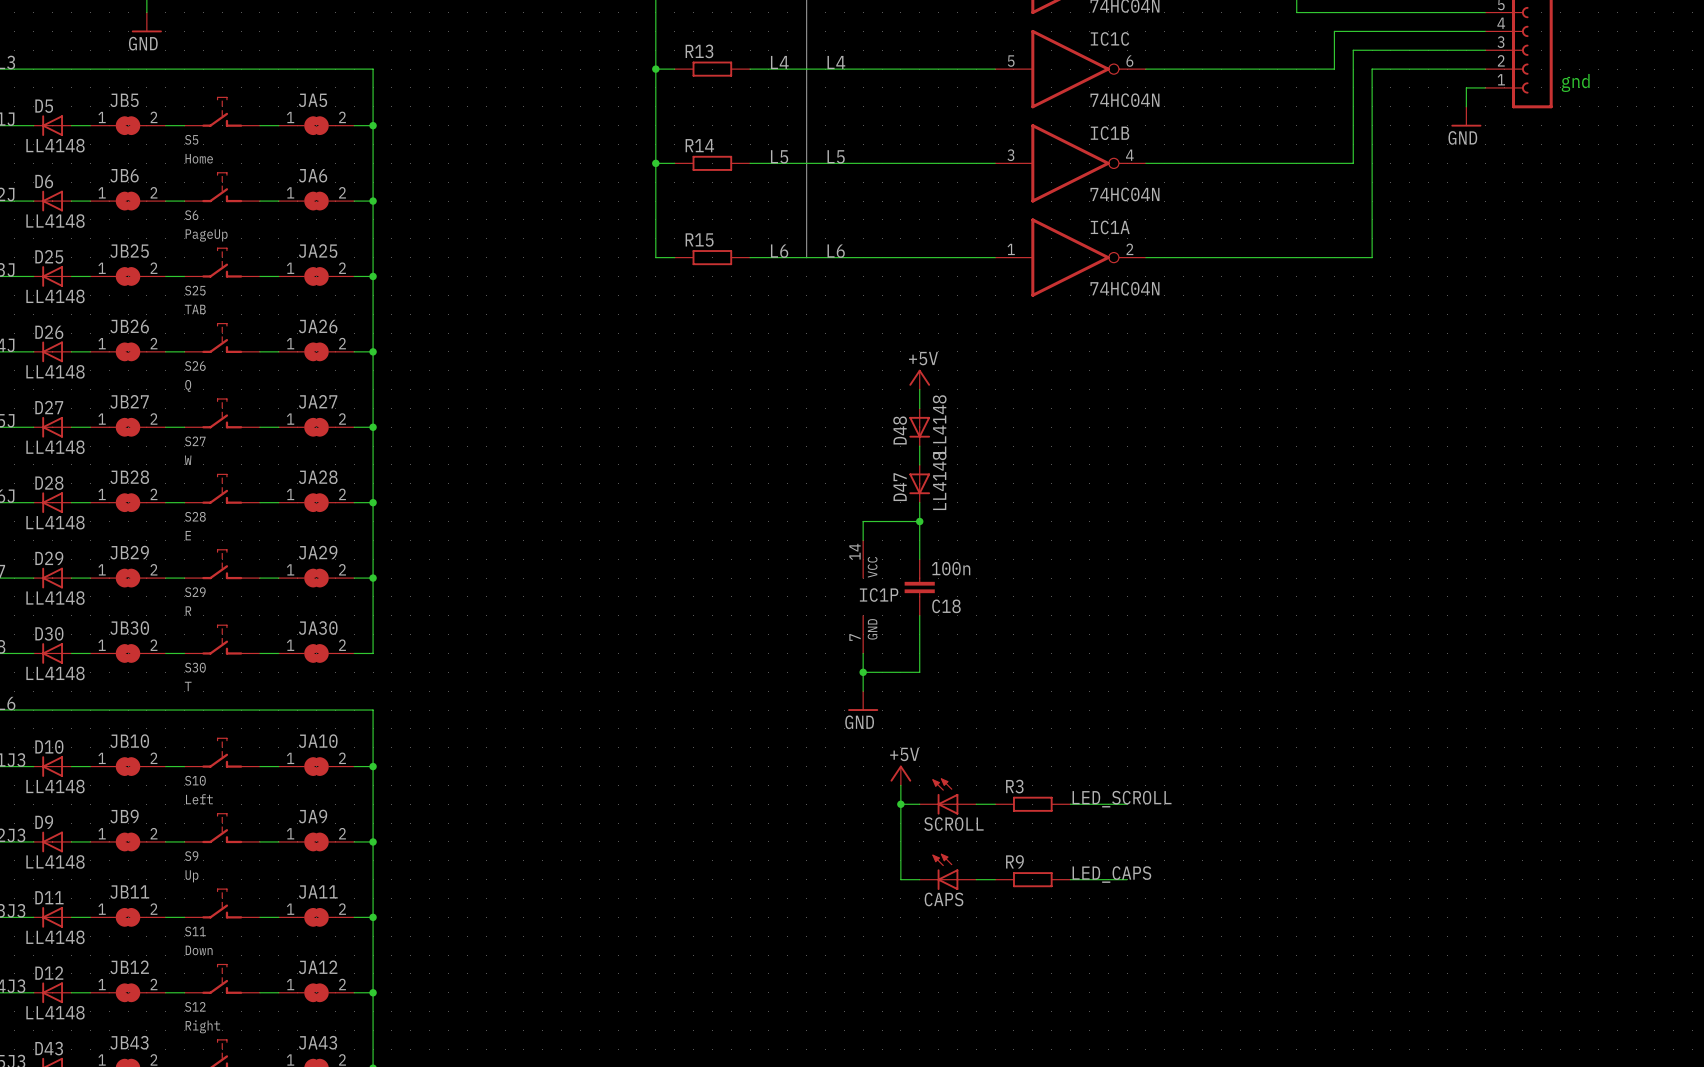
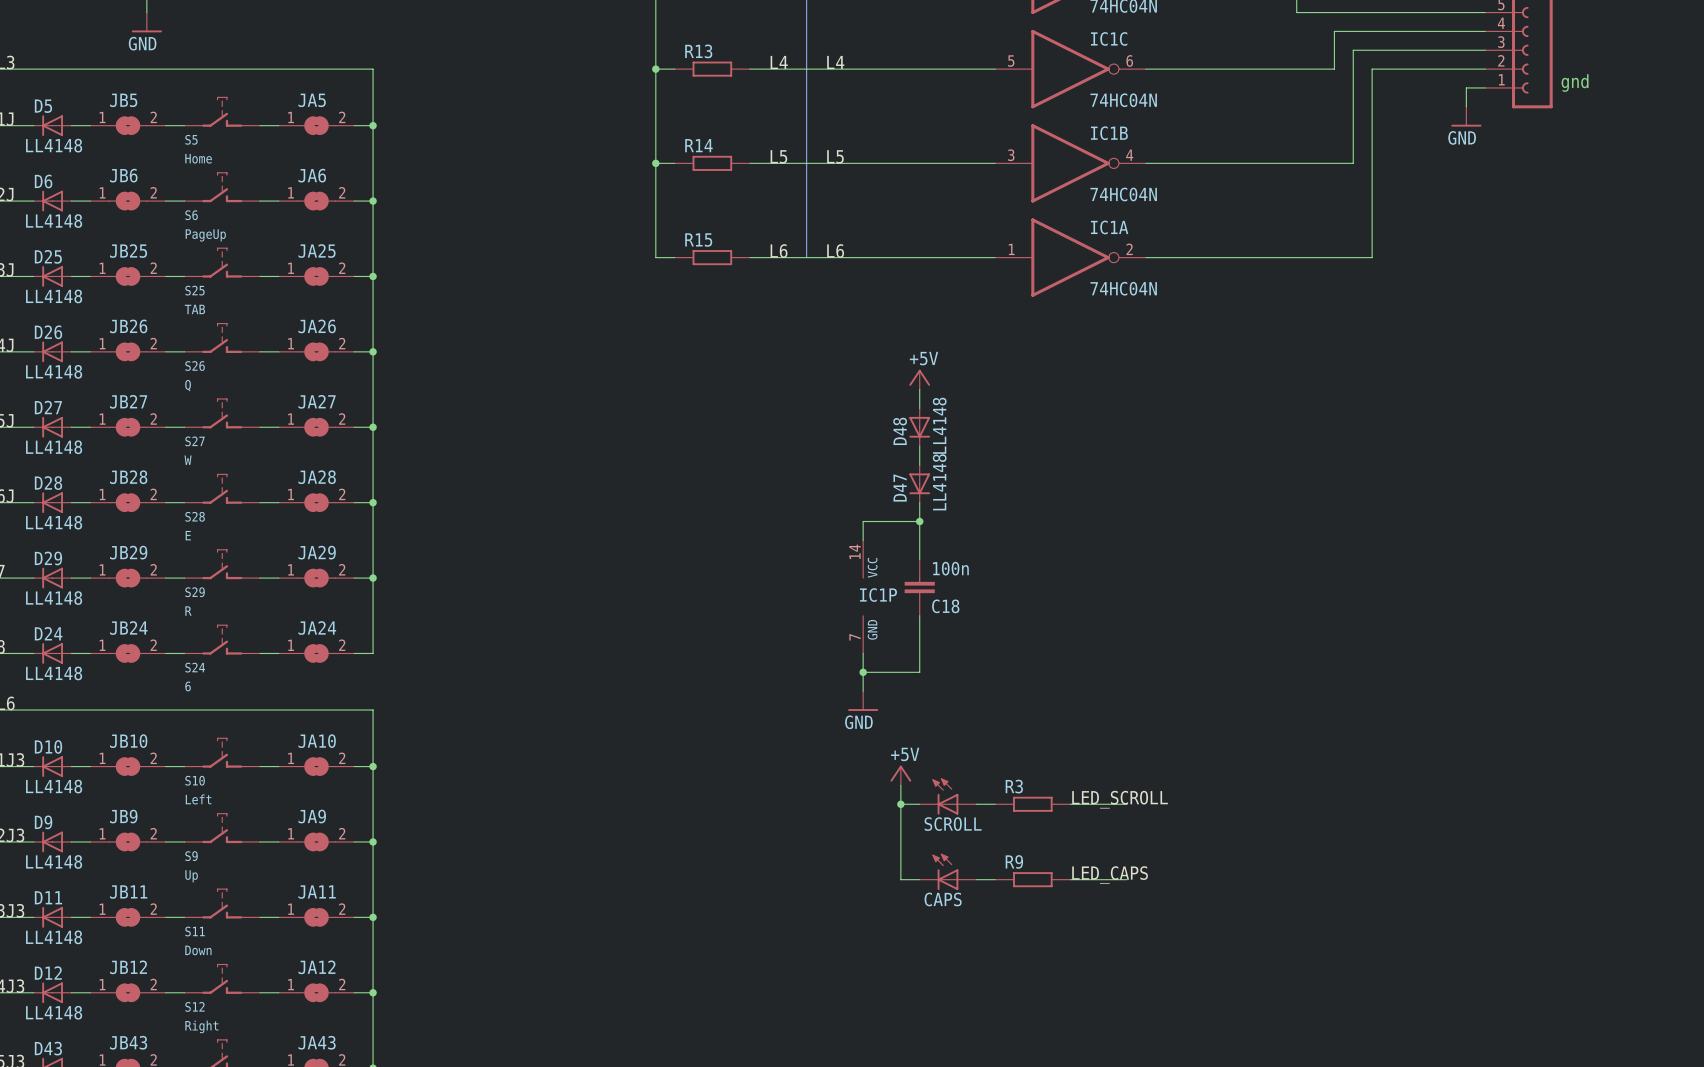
JB30 name: JB30 (129, 628) -> JB24 (128, 628)
JA30 name: JA30 (318, 628) -> JA24 (317, 628)
D30 name: D30 (49, 633) -> D24 (48, 633)
S30 name: S30 (195, 667) -> S24 (195, 667)
S30 value: T (188, 686) -> 6 (188, 686)

